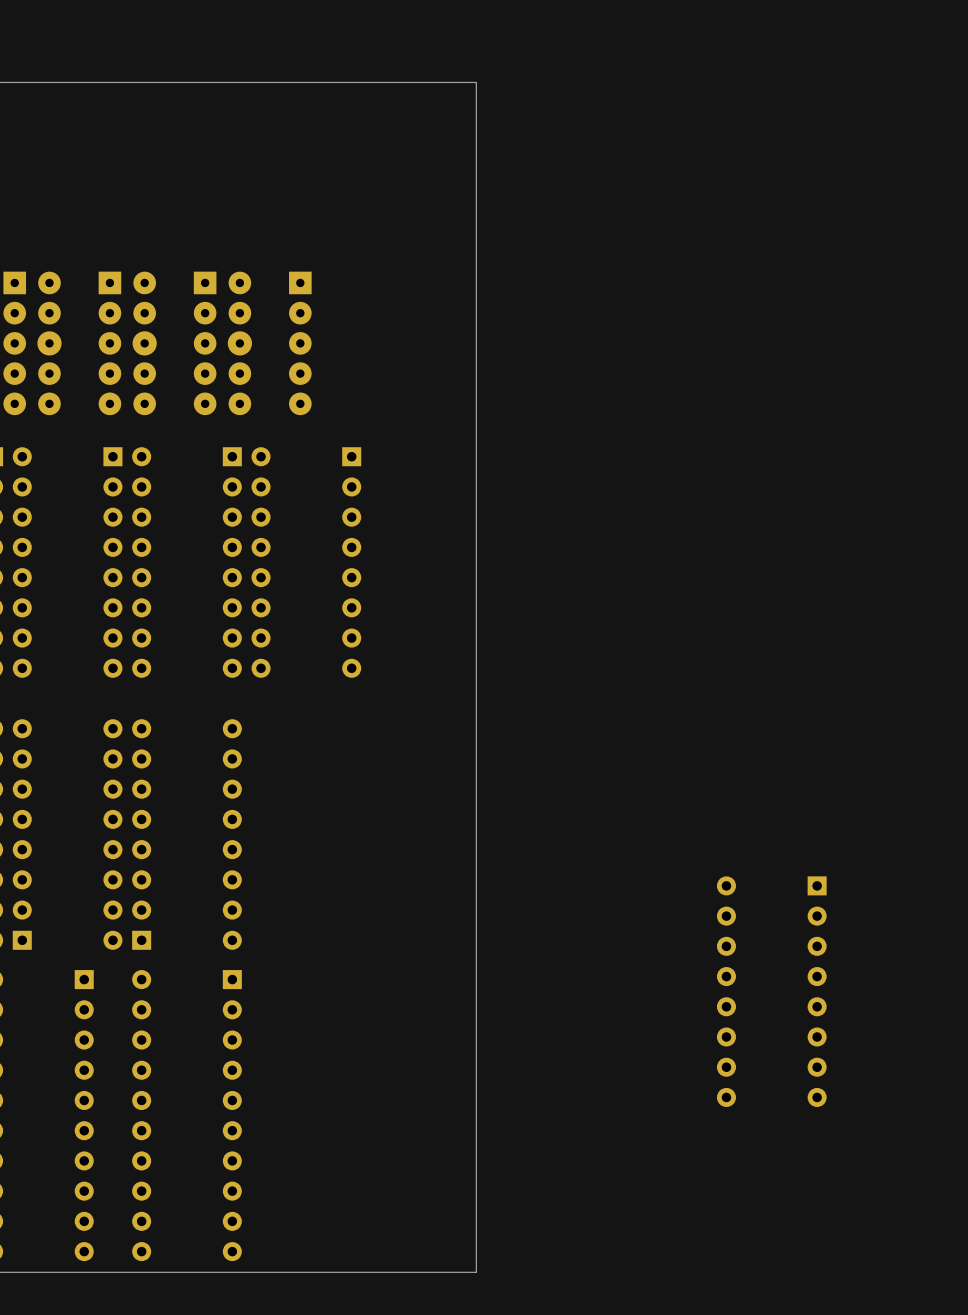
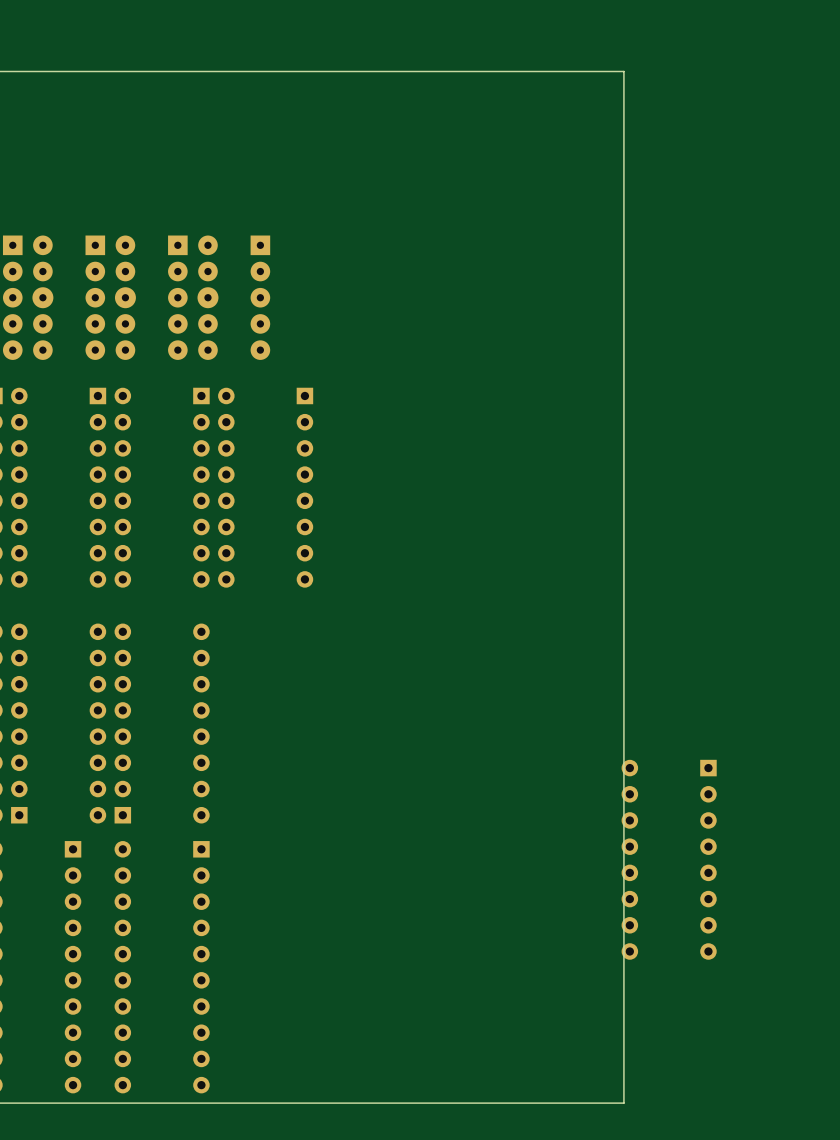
board edge: (476, 82) (476, 1272) -> (413, 71) (623, 71) (623, 1103) (413, 1103)

